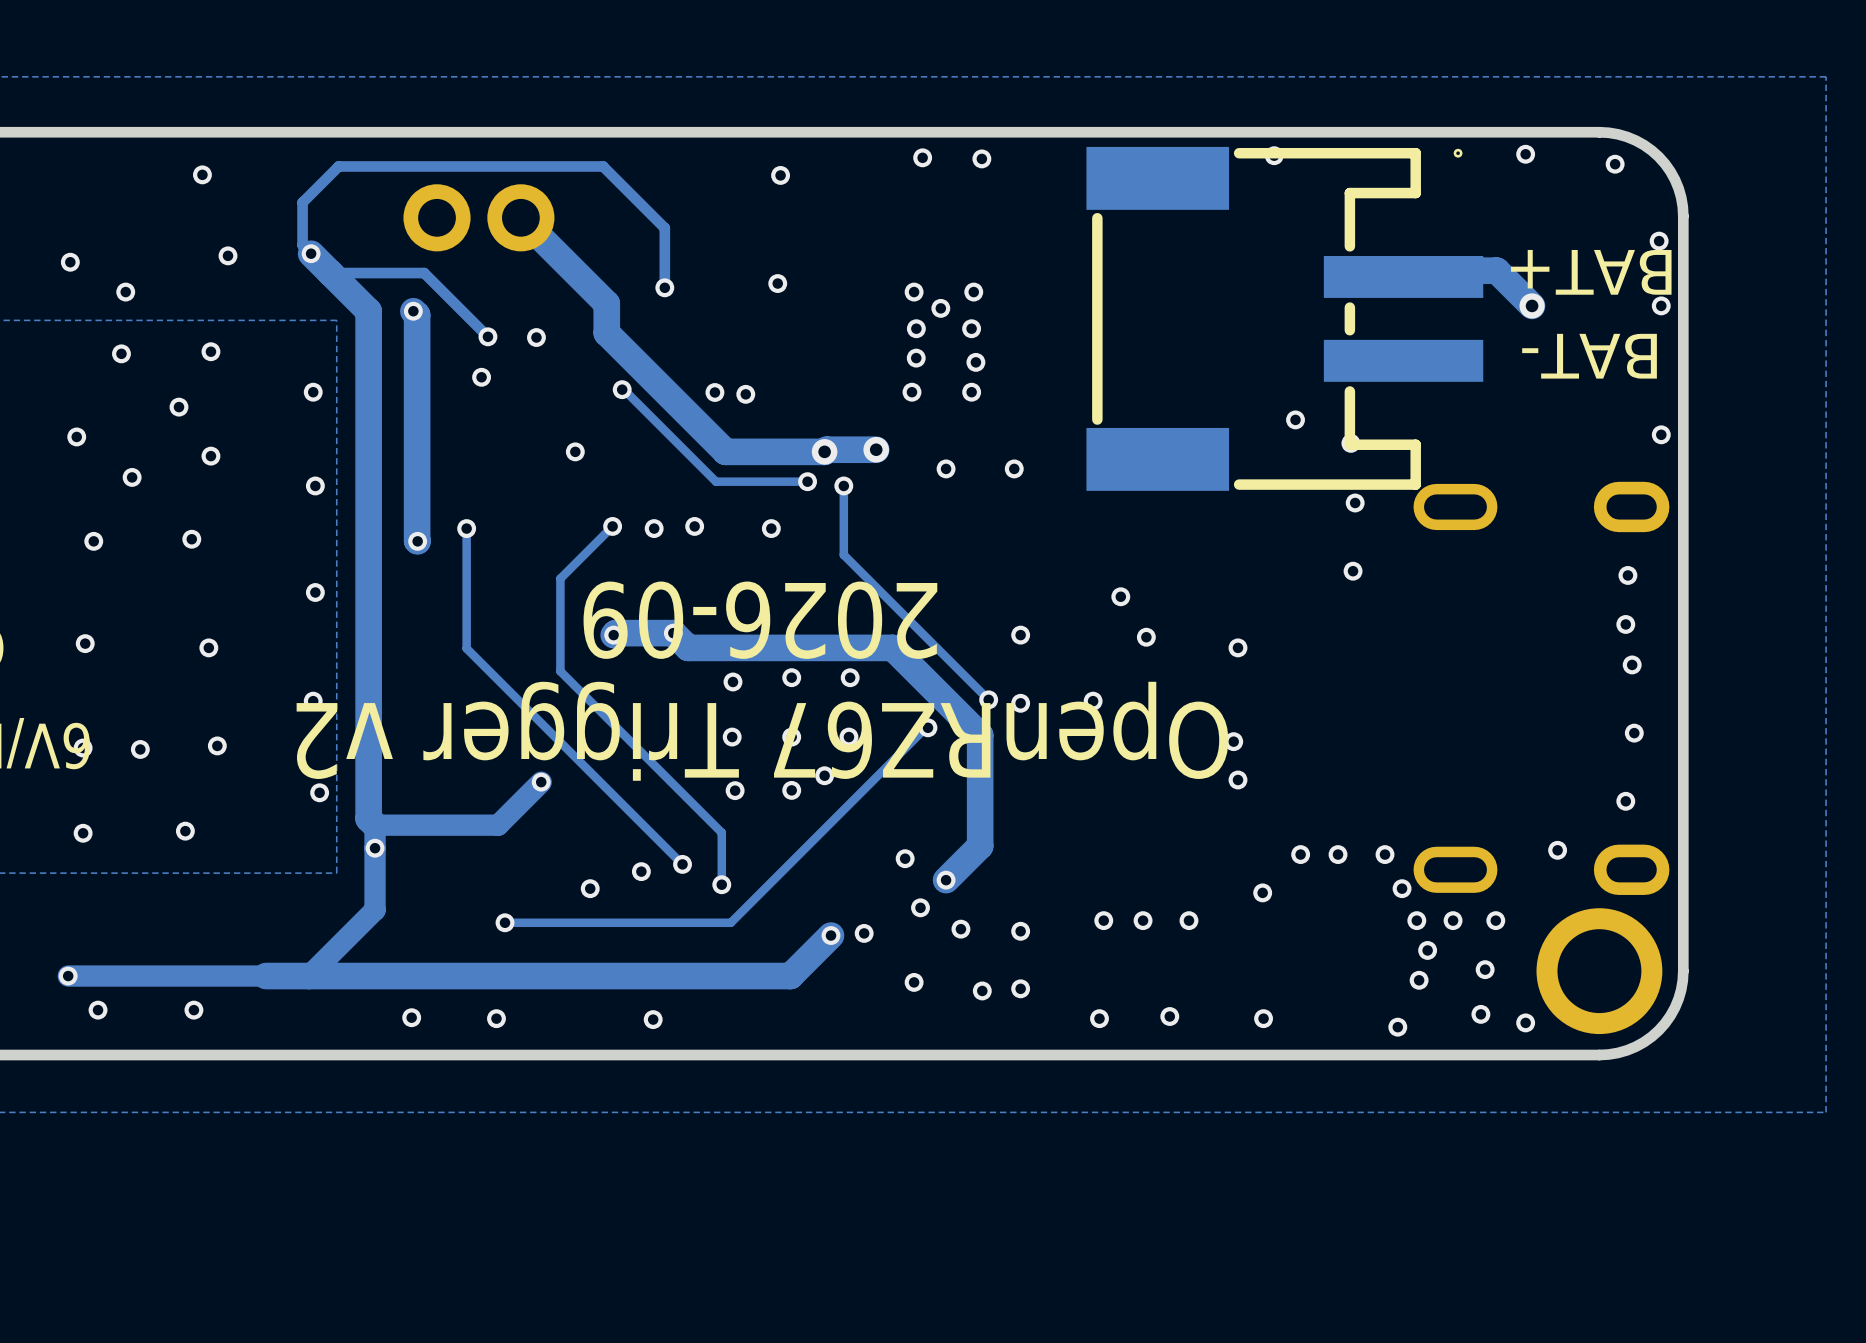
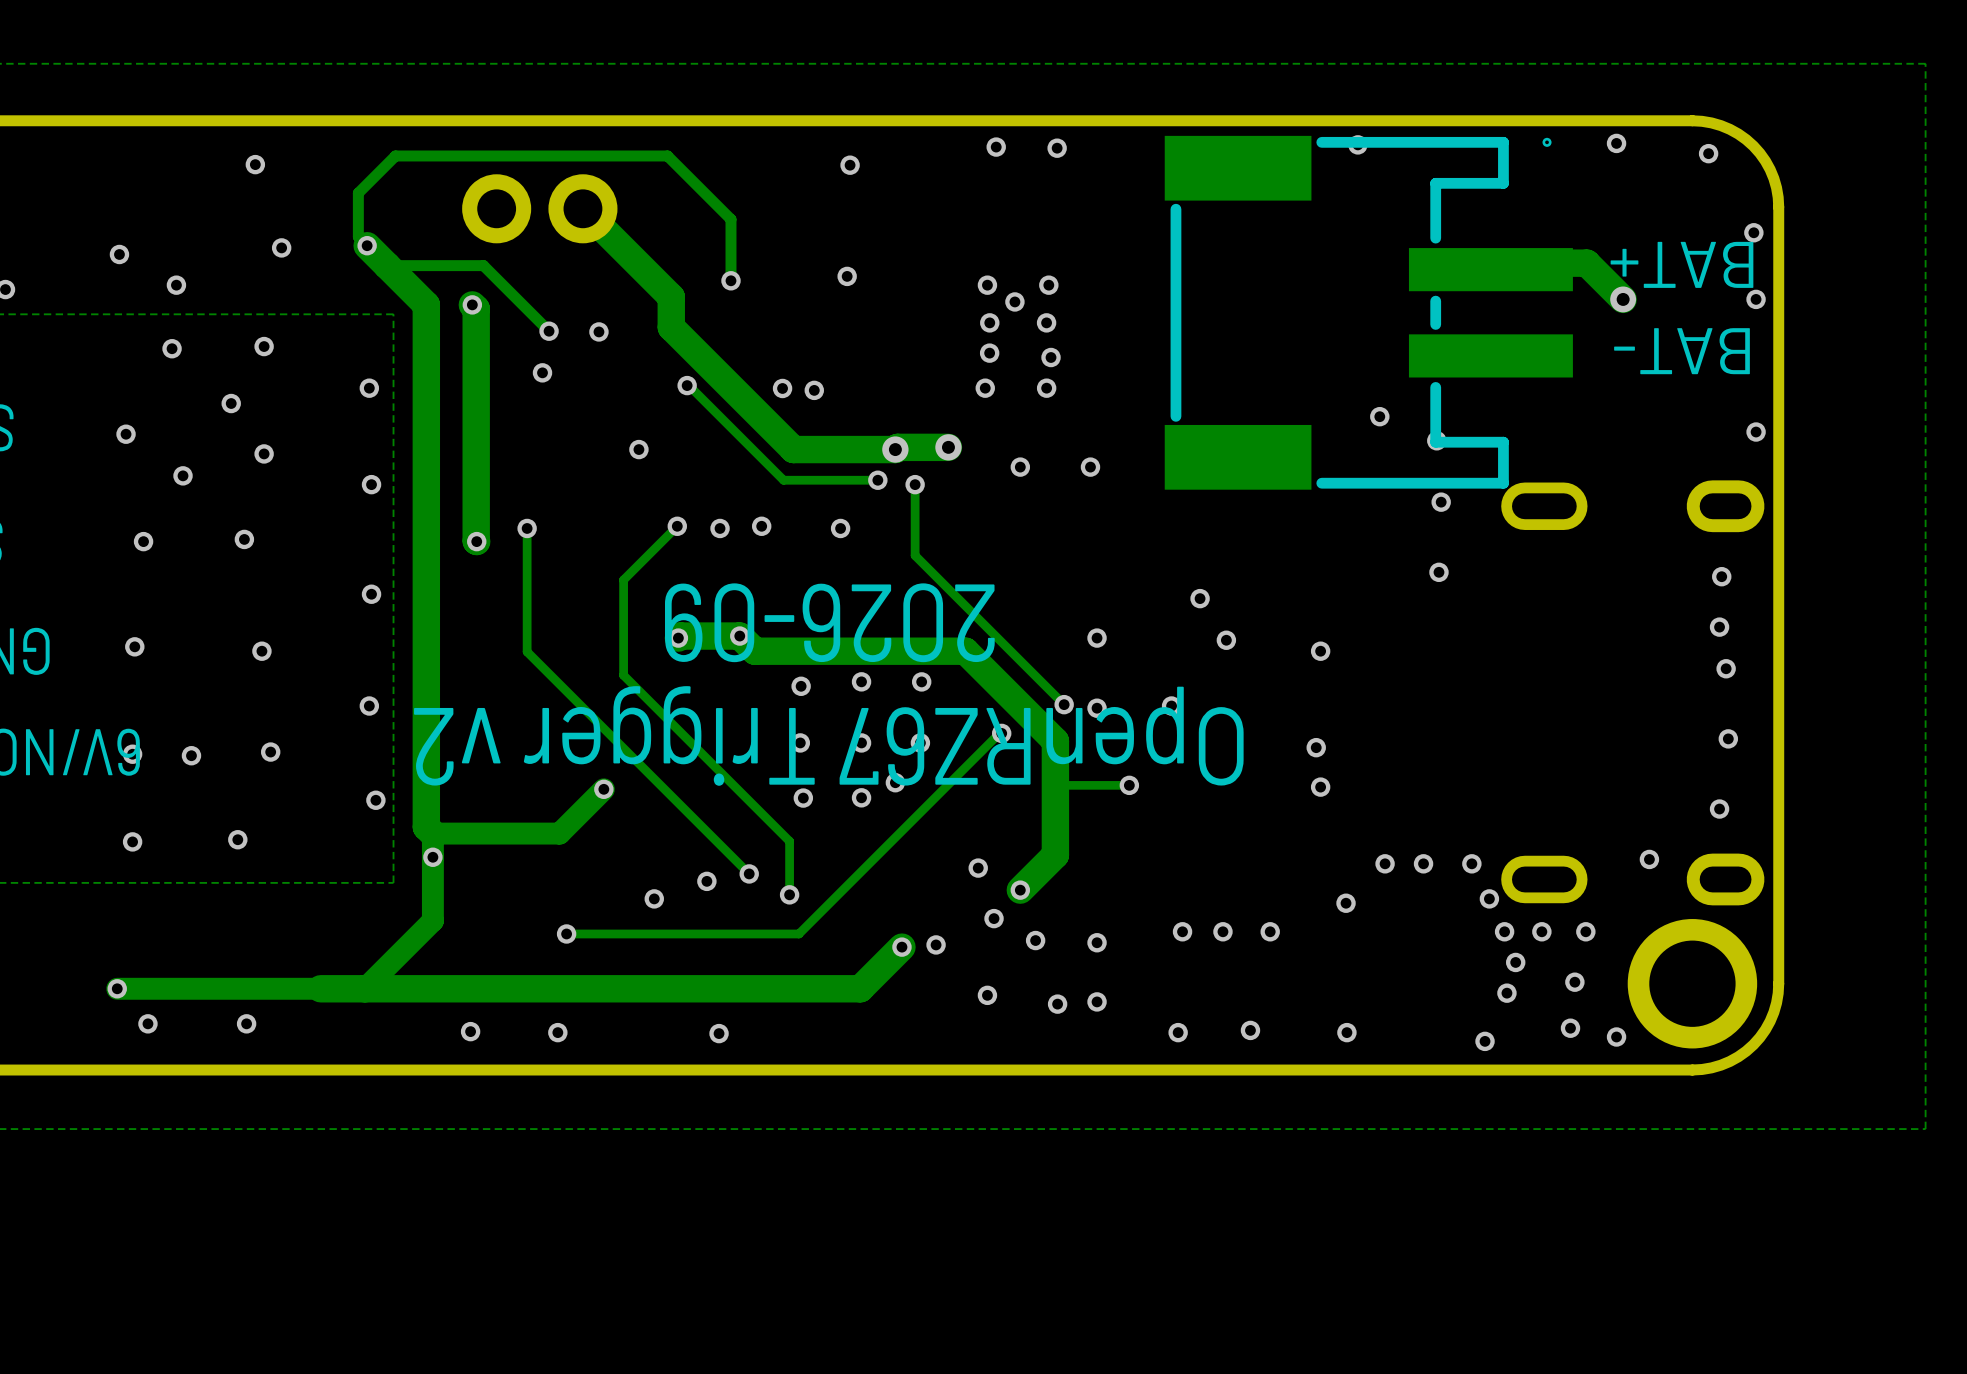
track: none -> (1129, 785) (1055, 785)
via: none -> (1129, 785)

